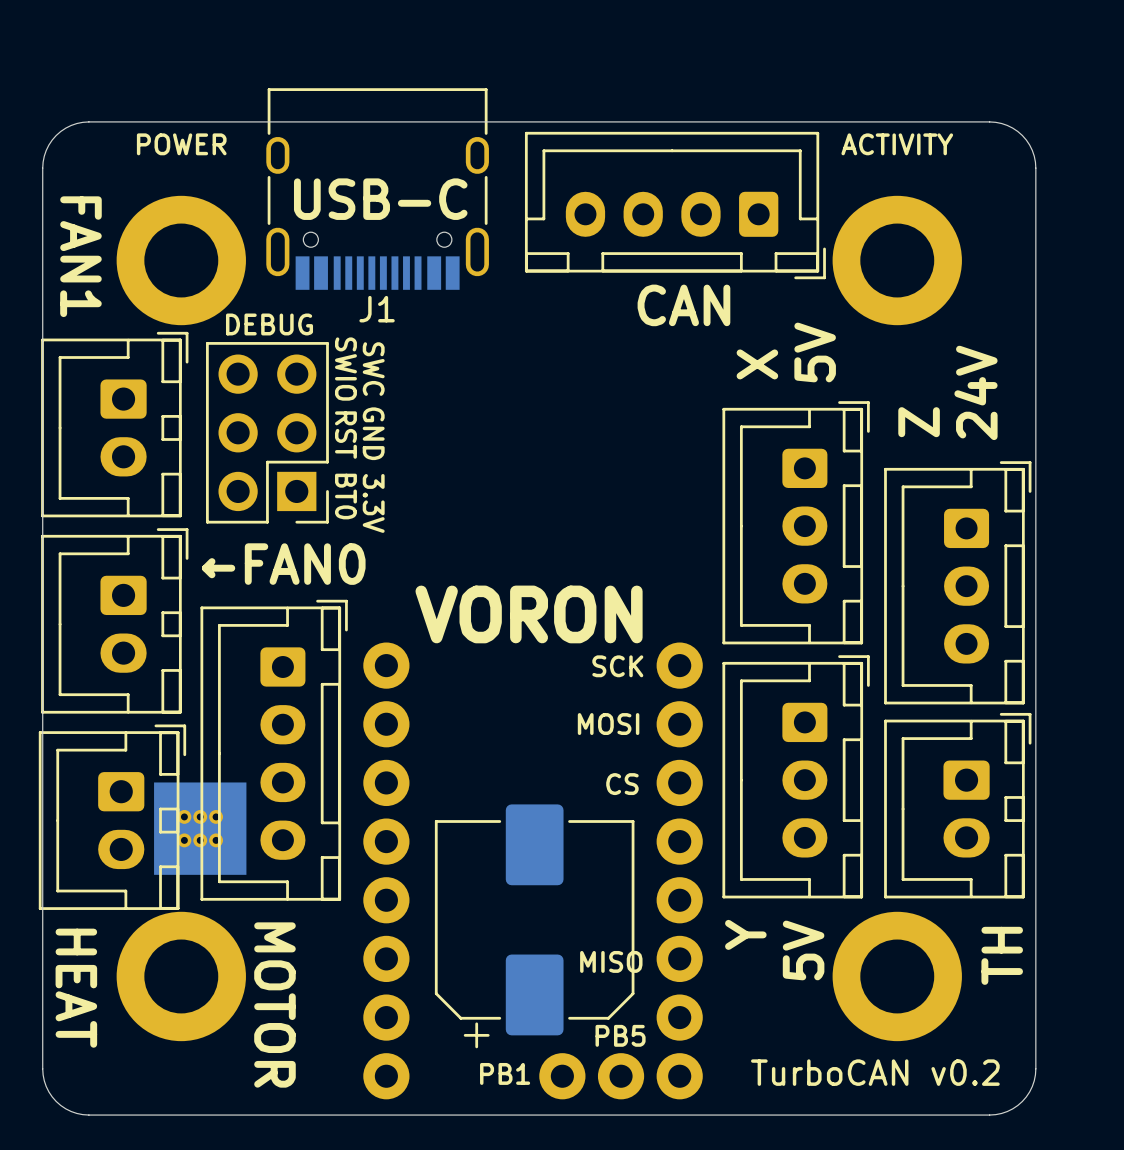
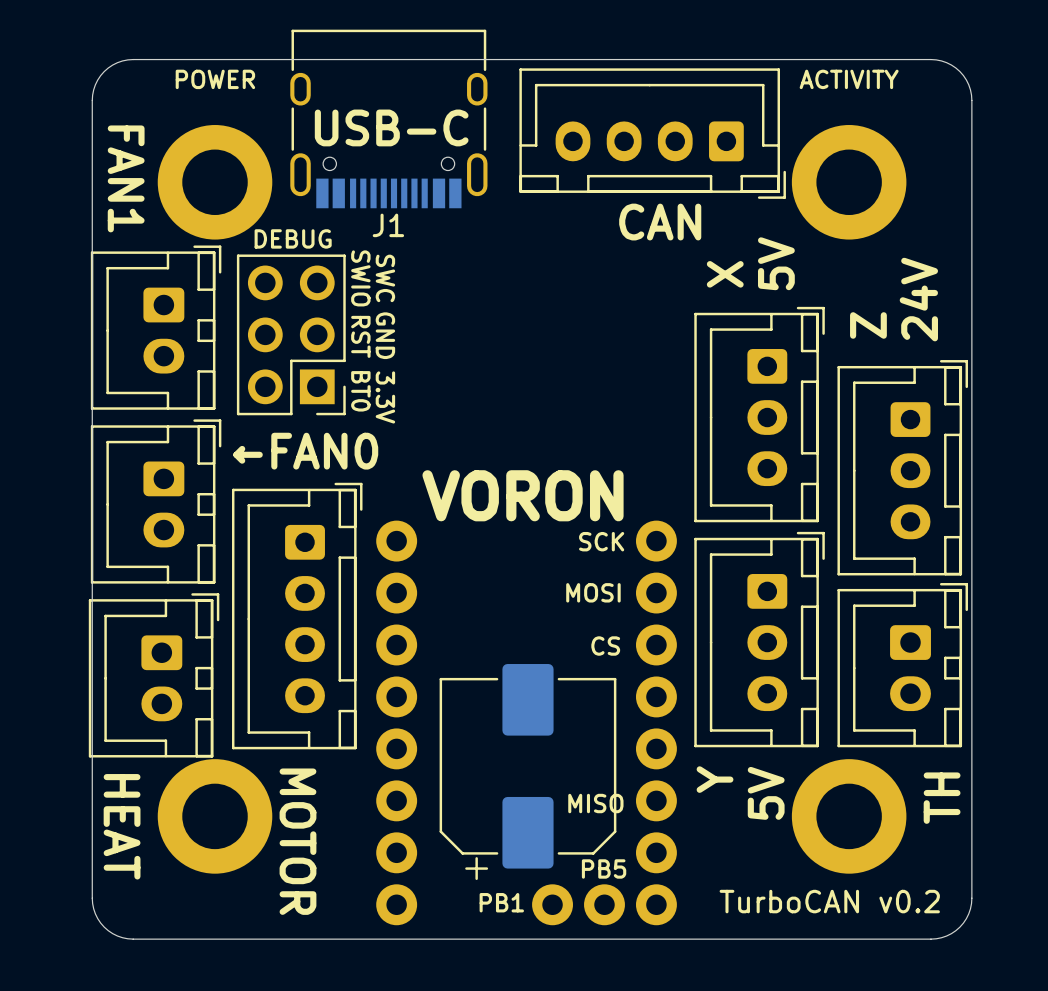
part: (200, 828) -> none

